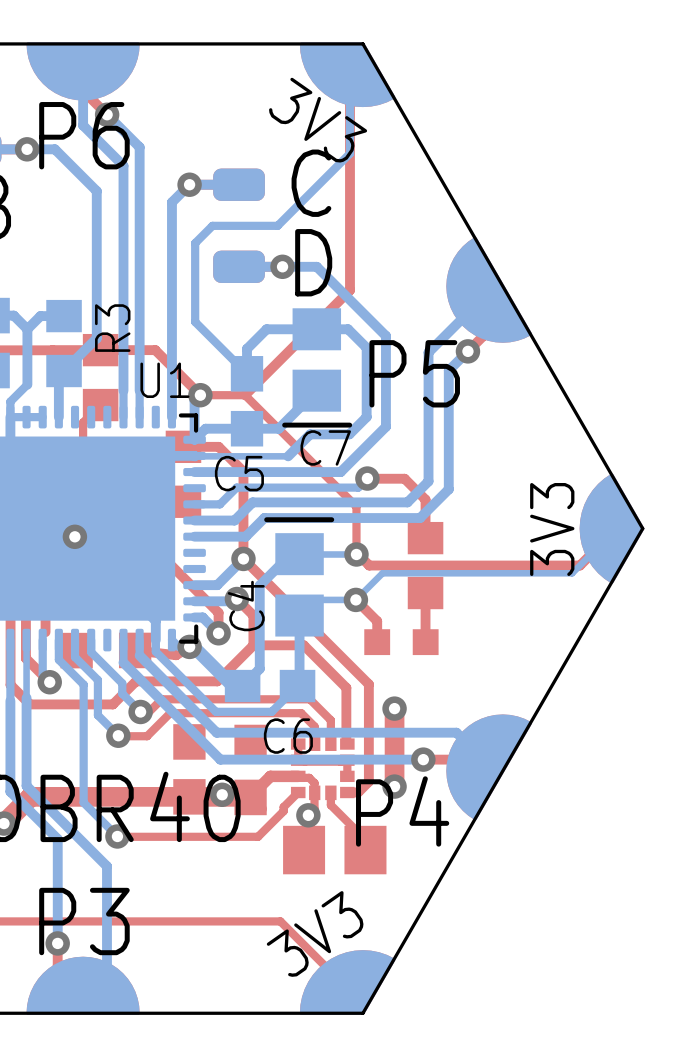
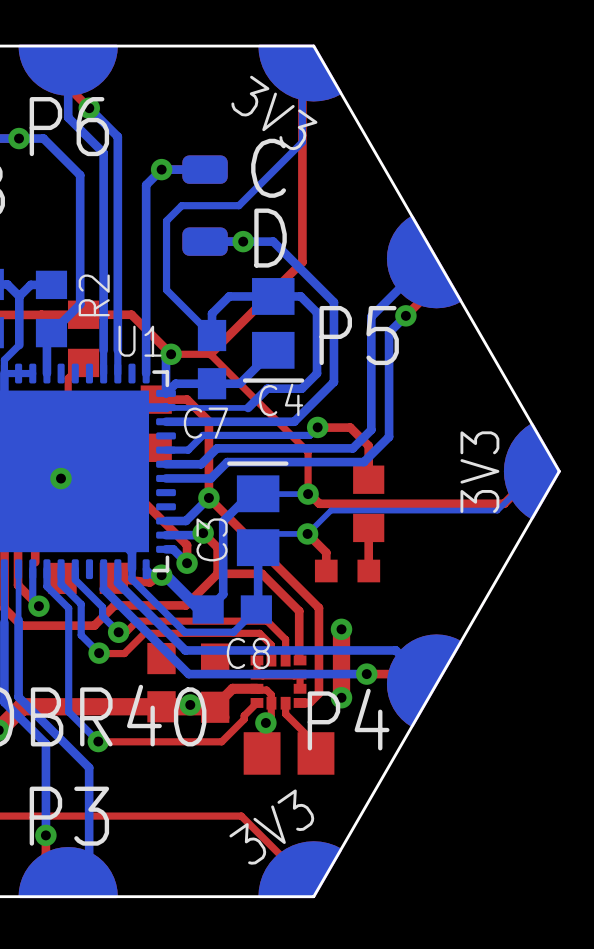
R3 name: R3 (112, 328) -> R2 (94, 295)
C7 name: C7 (325, 447) -> C4 (281, 399)
C5 name: C5 (239, 473) -> C7 (205, 423)
C4 name: C4 (246, 606) -> C3 (212, 539)
C6 name: C6 (288, 736) -> C8 (248, 653)

